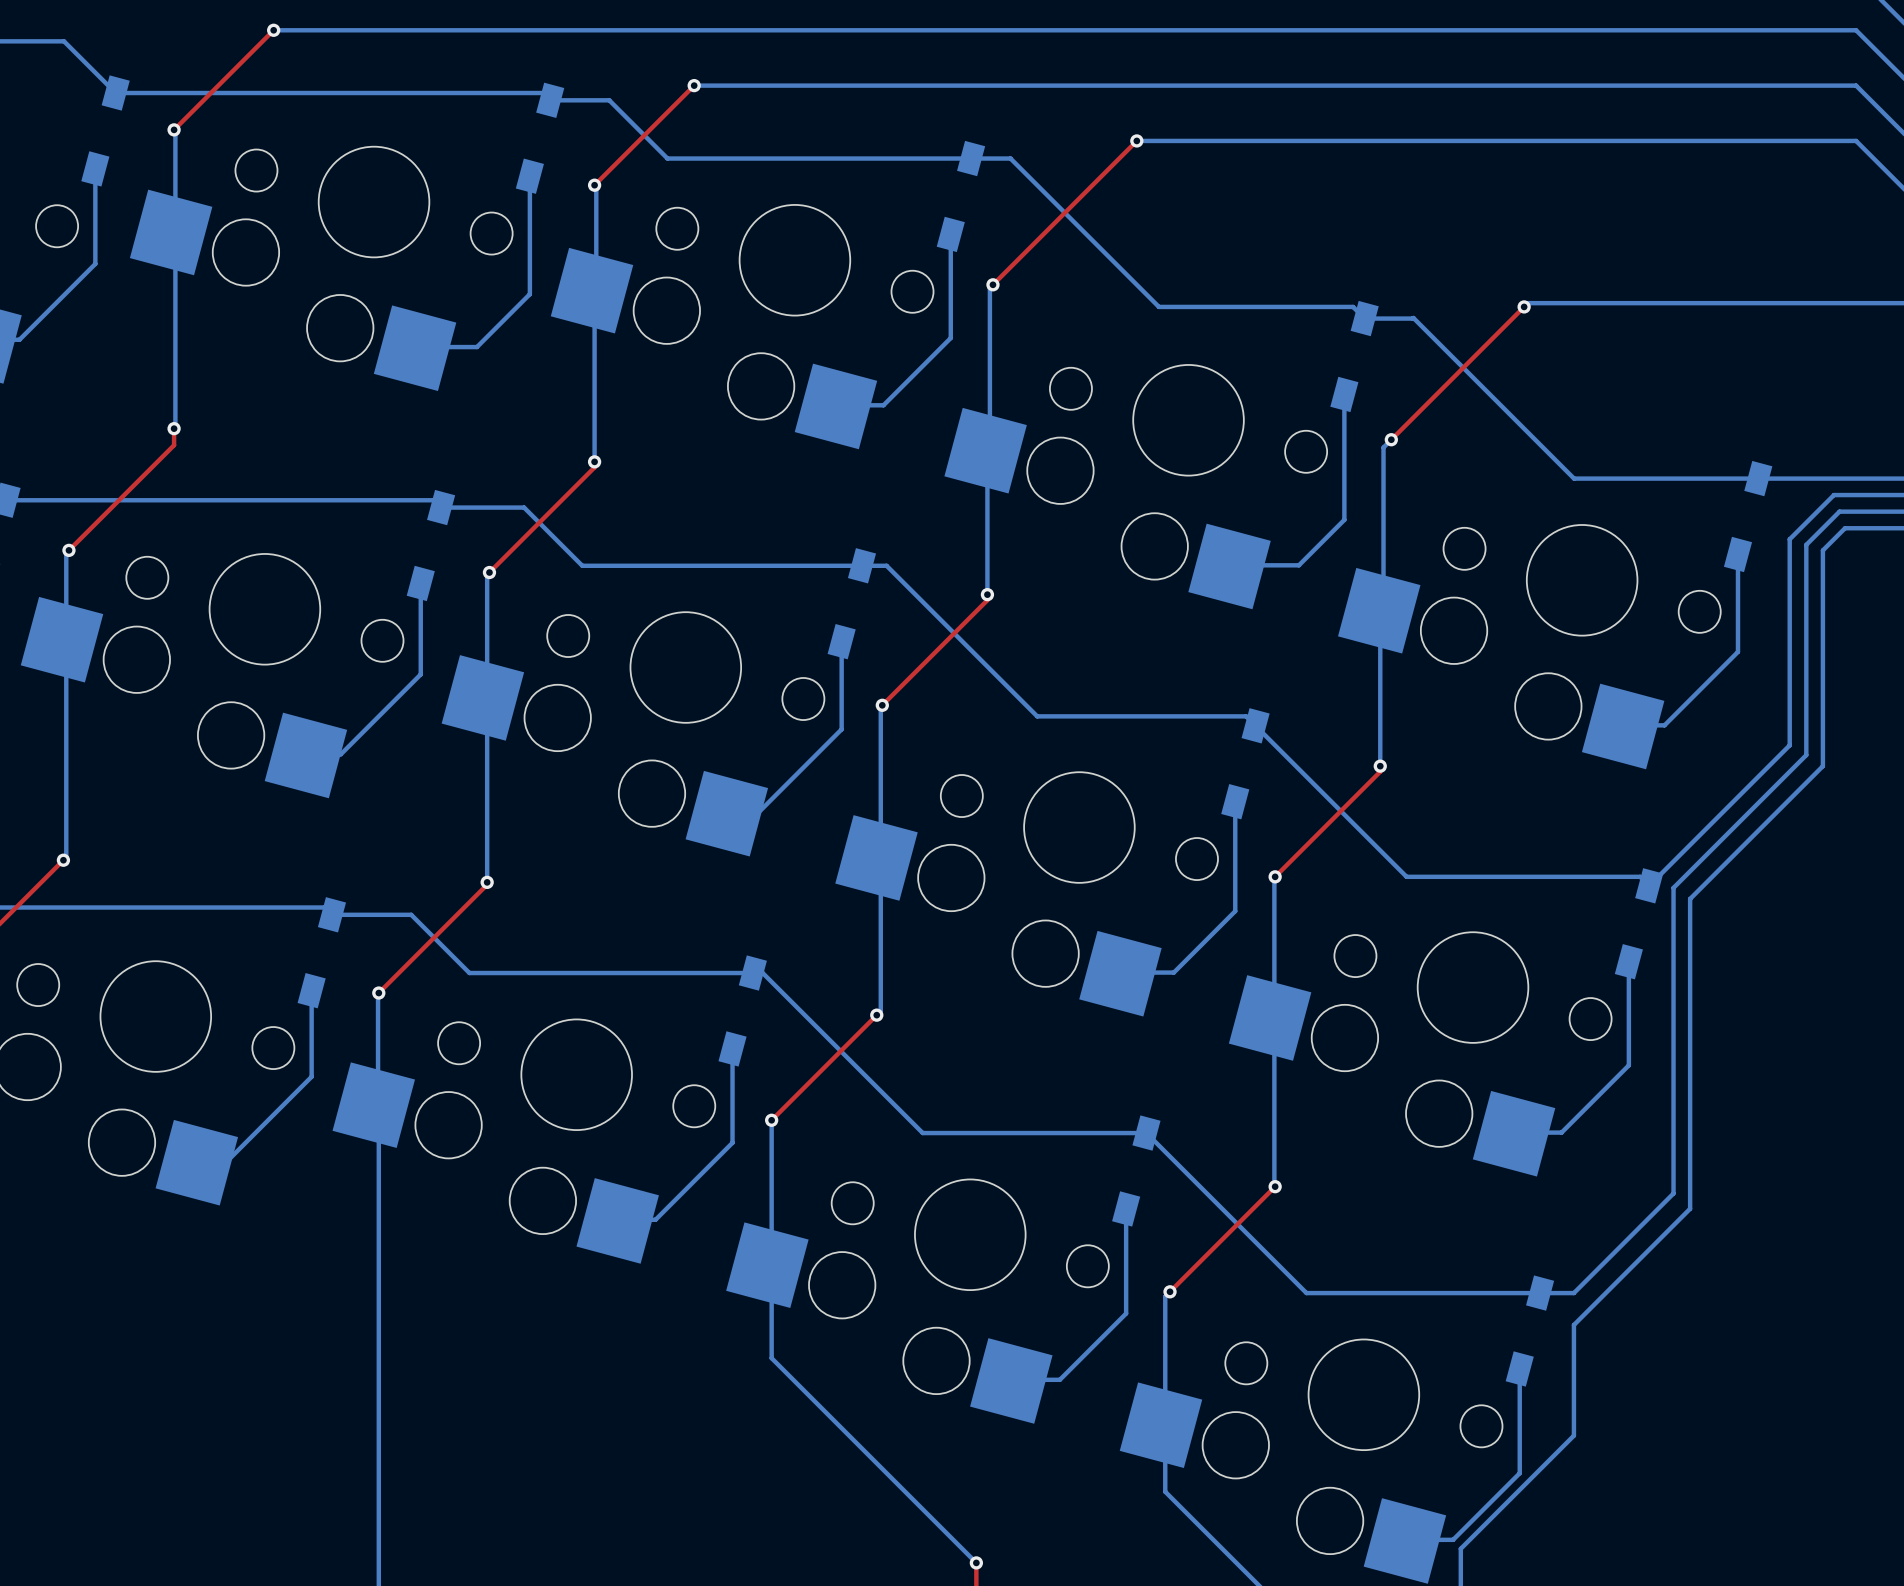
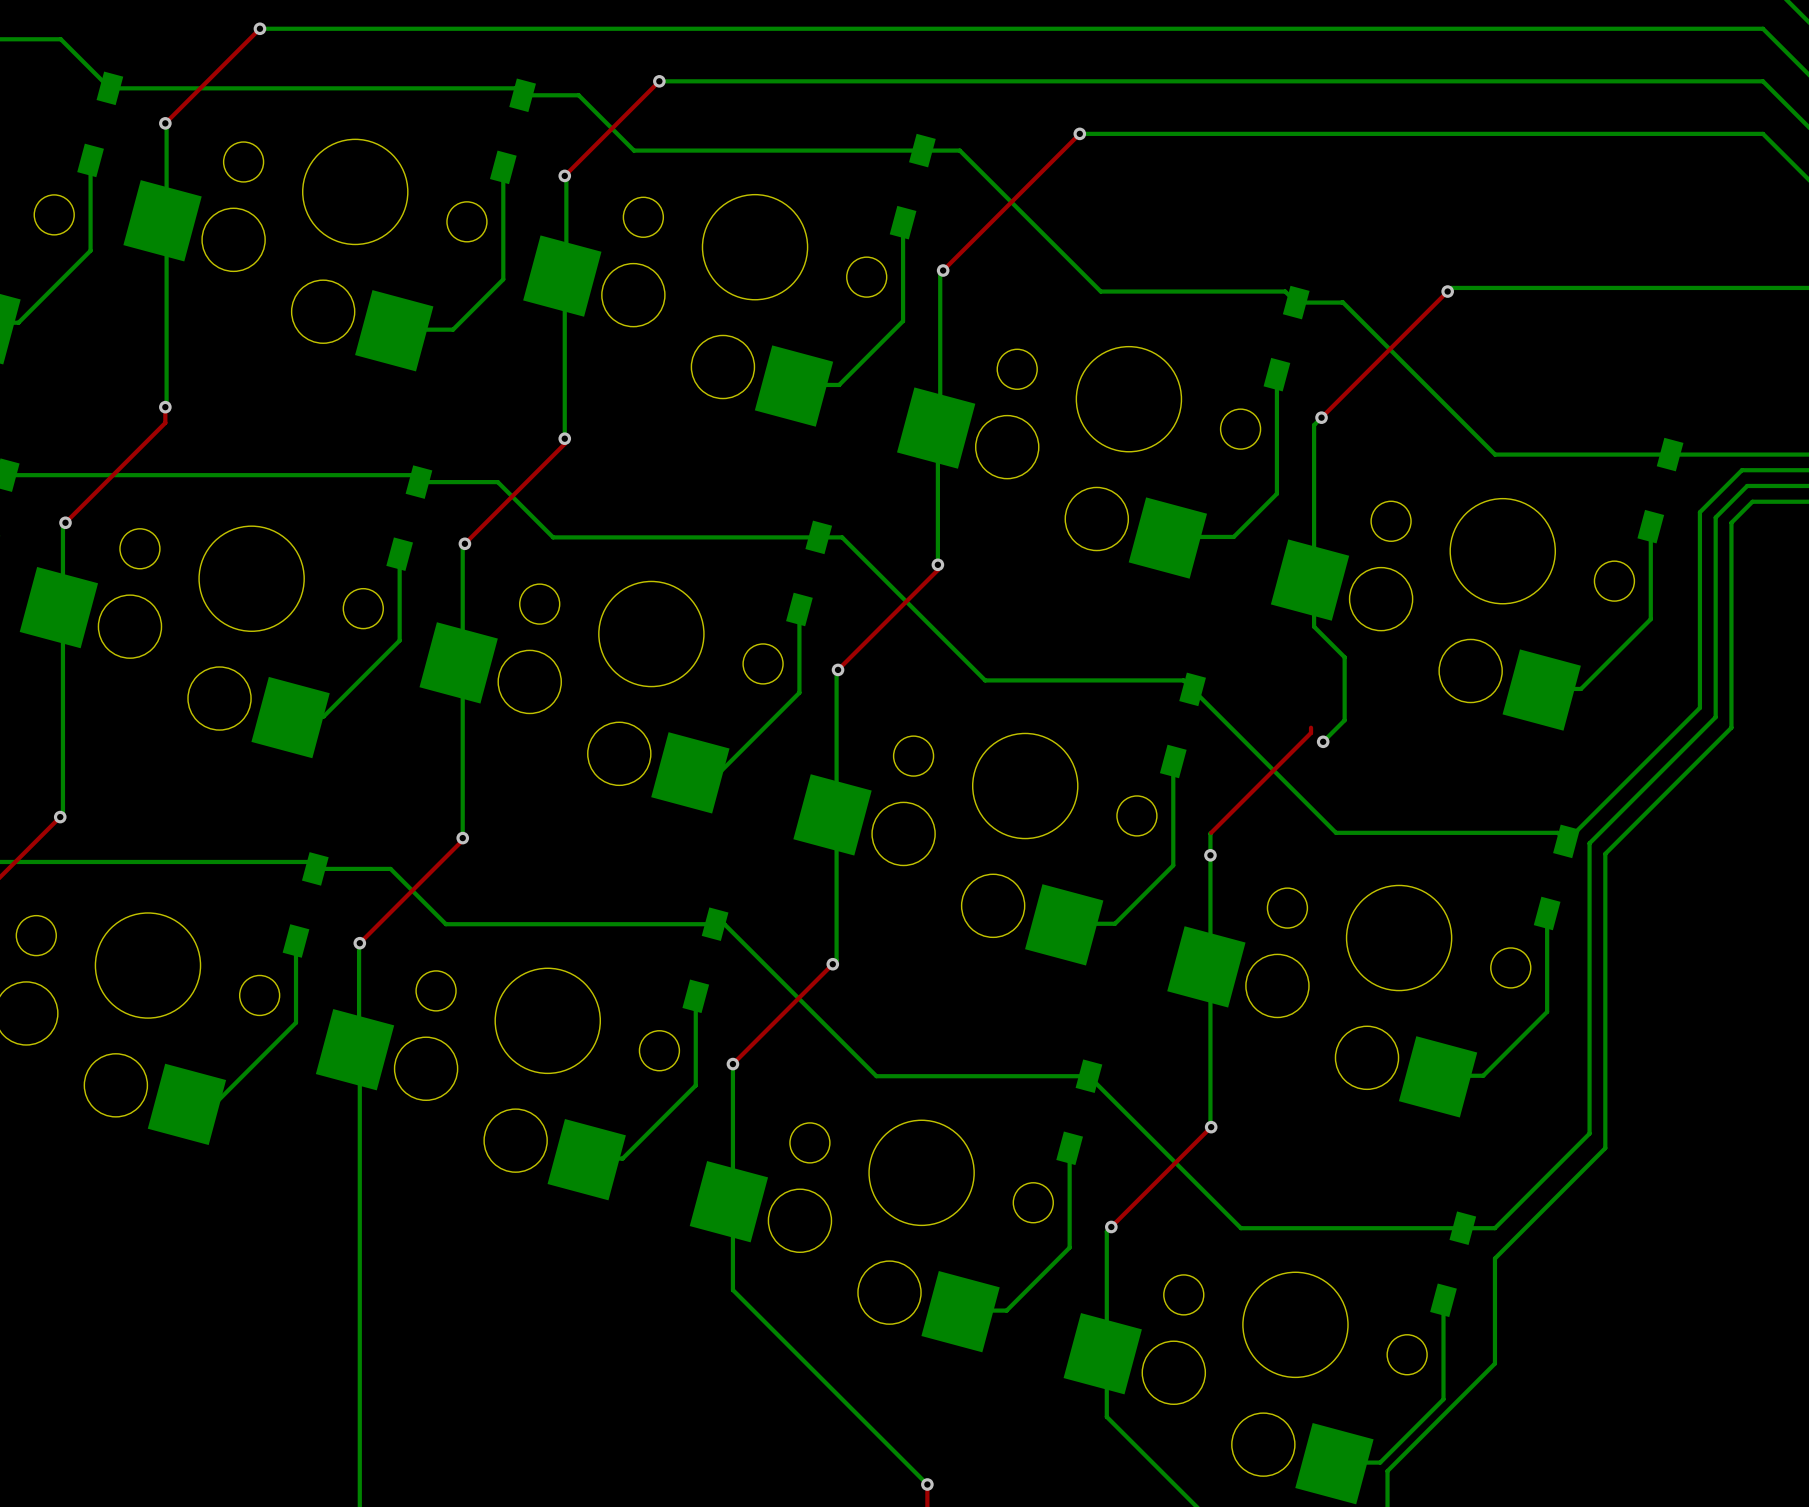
bottom track: (1383, 611) (1380, 615) (1380, 766) -> (1314, 581) (1314, 626) (1344, 657) (1344, 720) (1323, 741)
via position: (1380, 766) -> (1323, 741)
via position: (1275, 876) -> (1210, 855)

